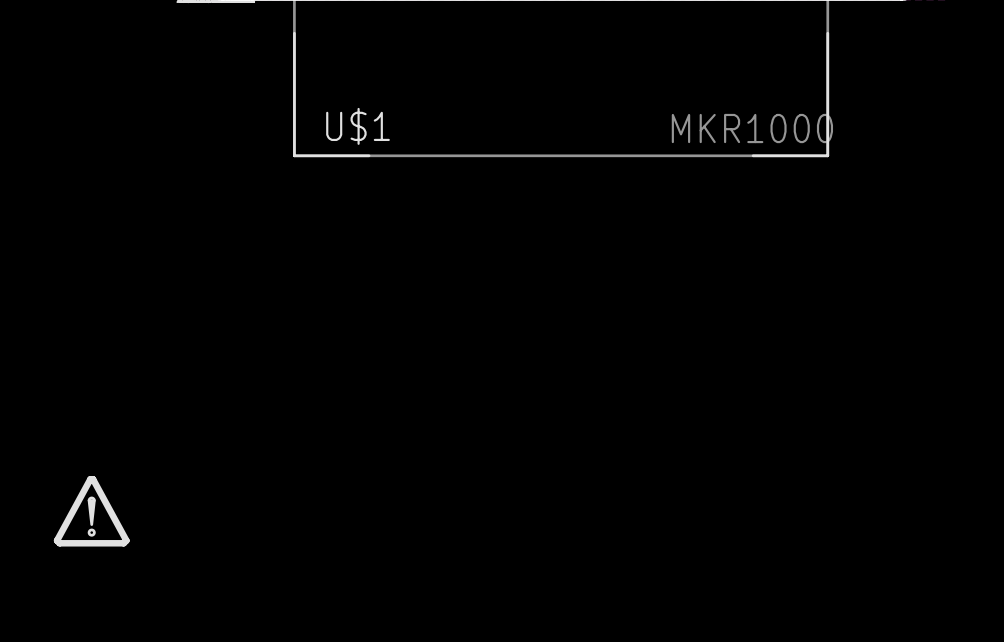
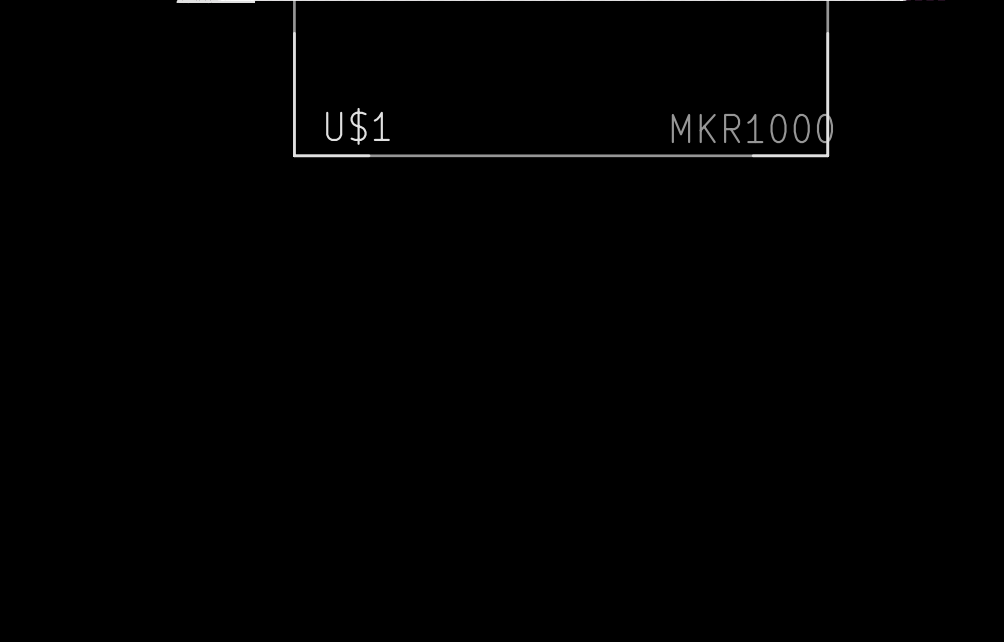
drawing: [53, 476, 130, 547] -> none

